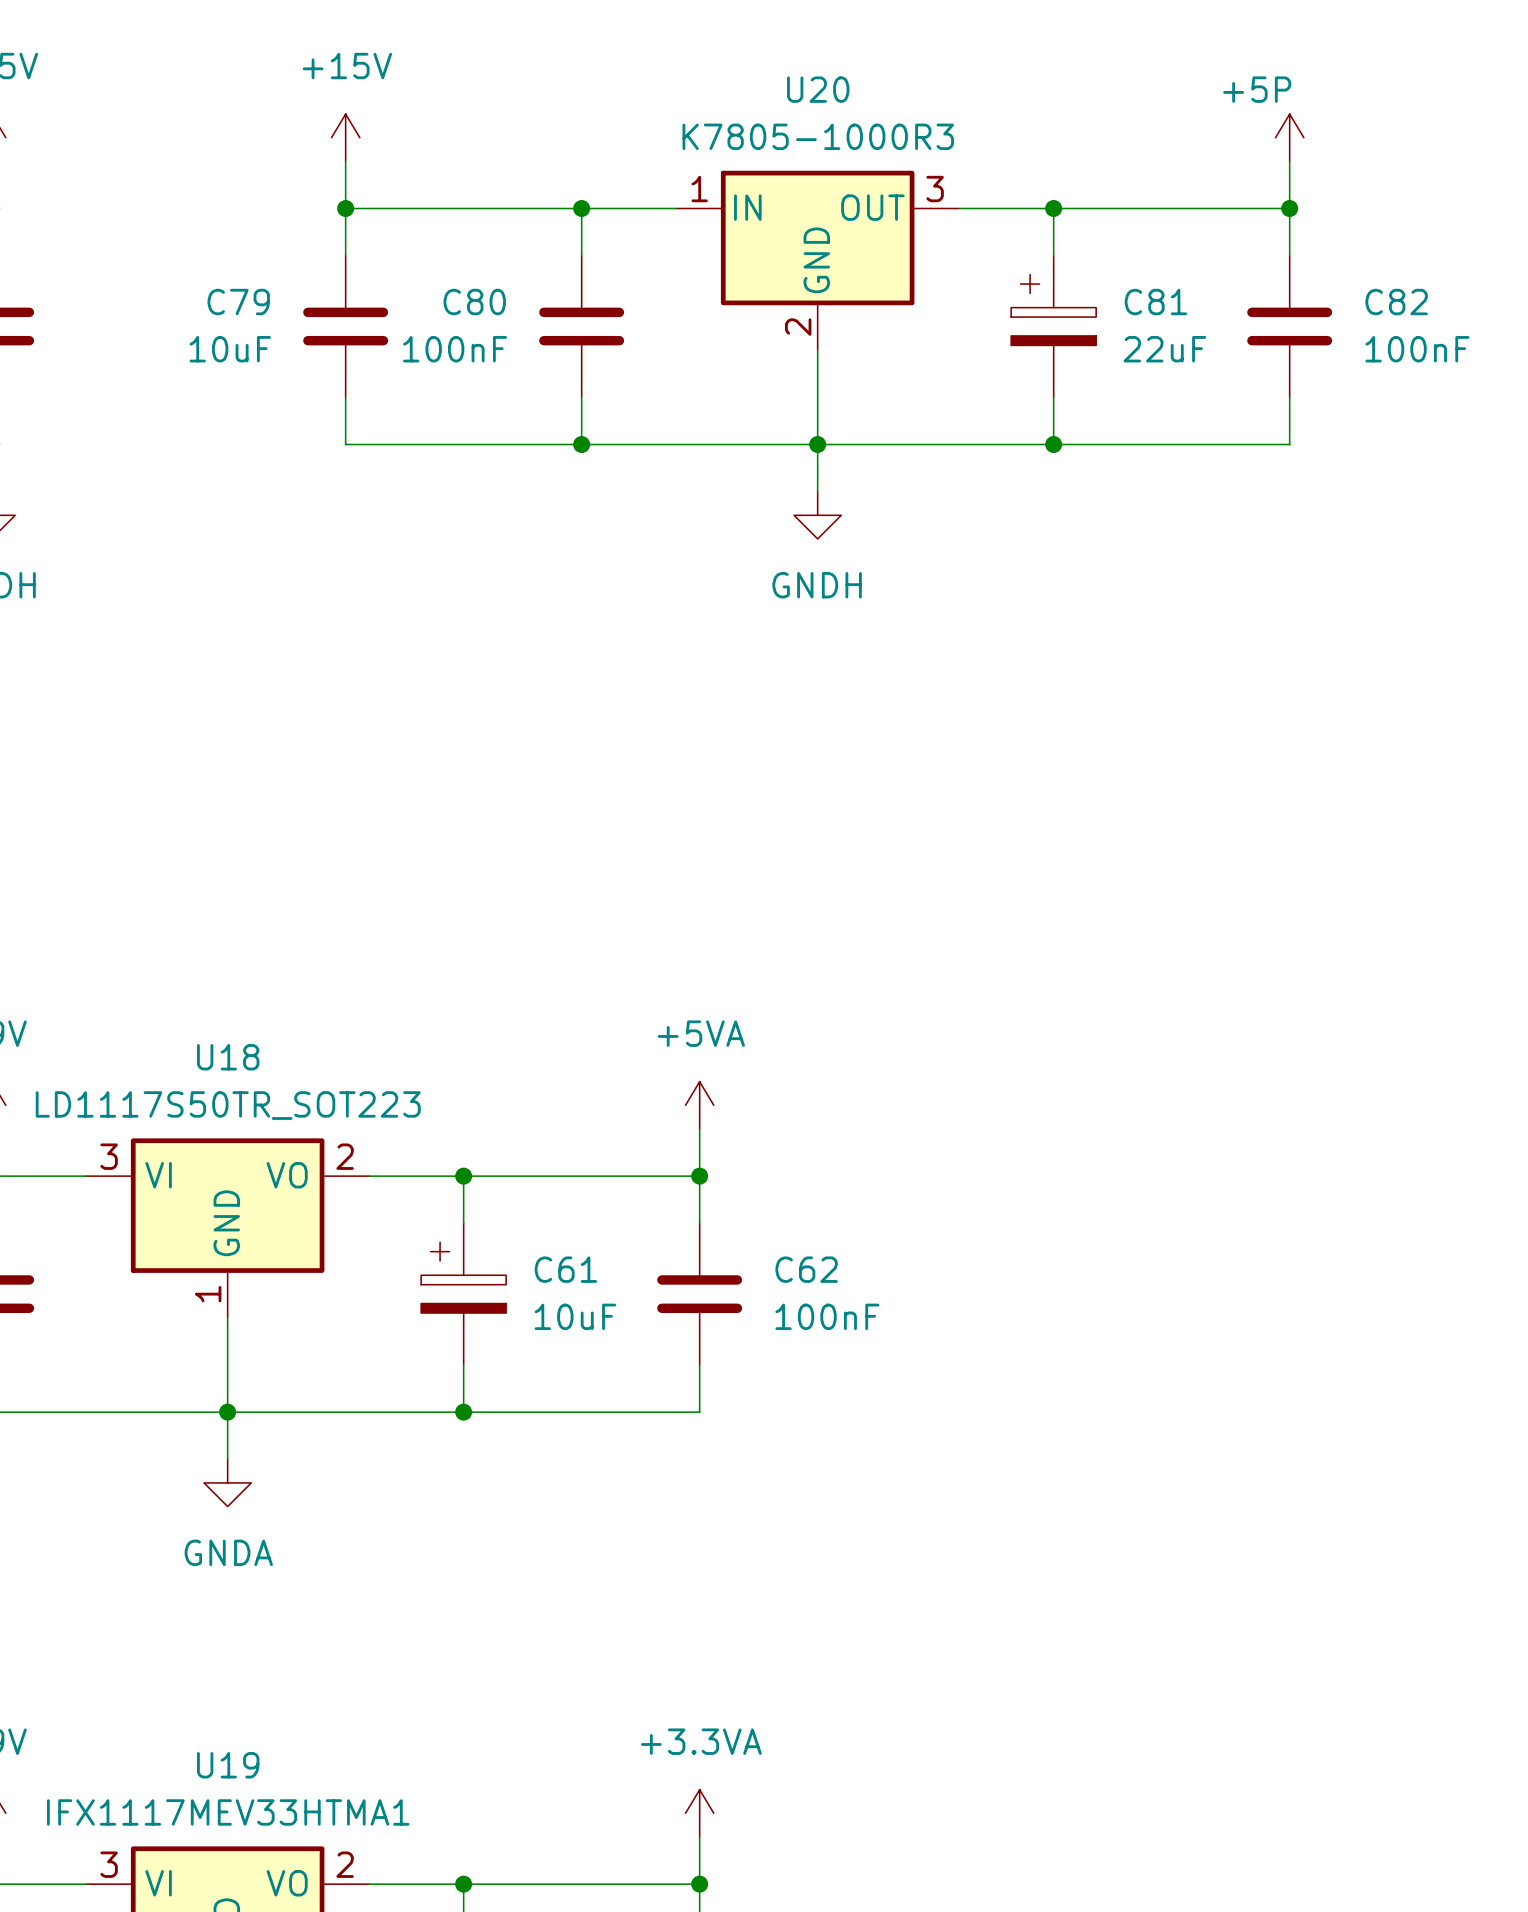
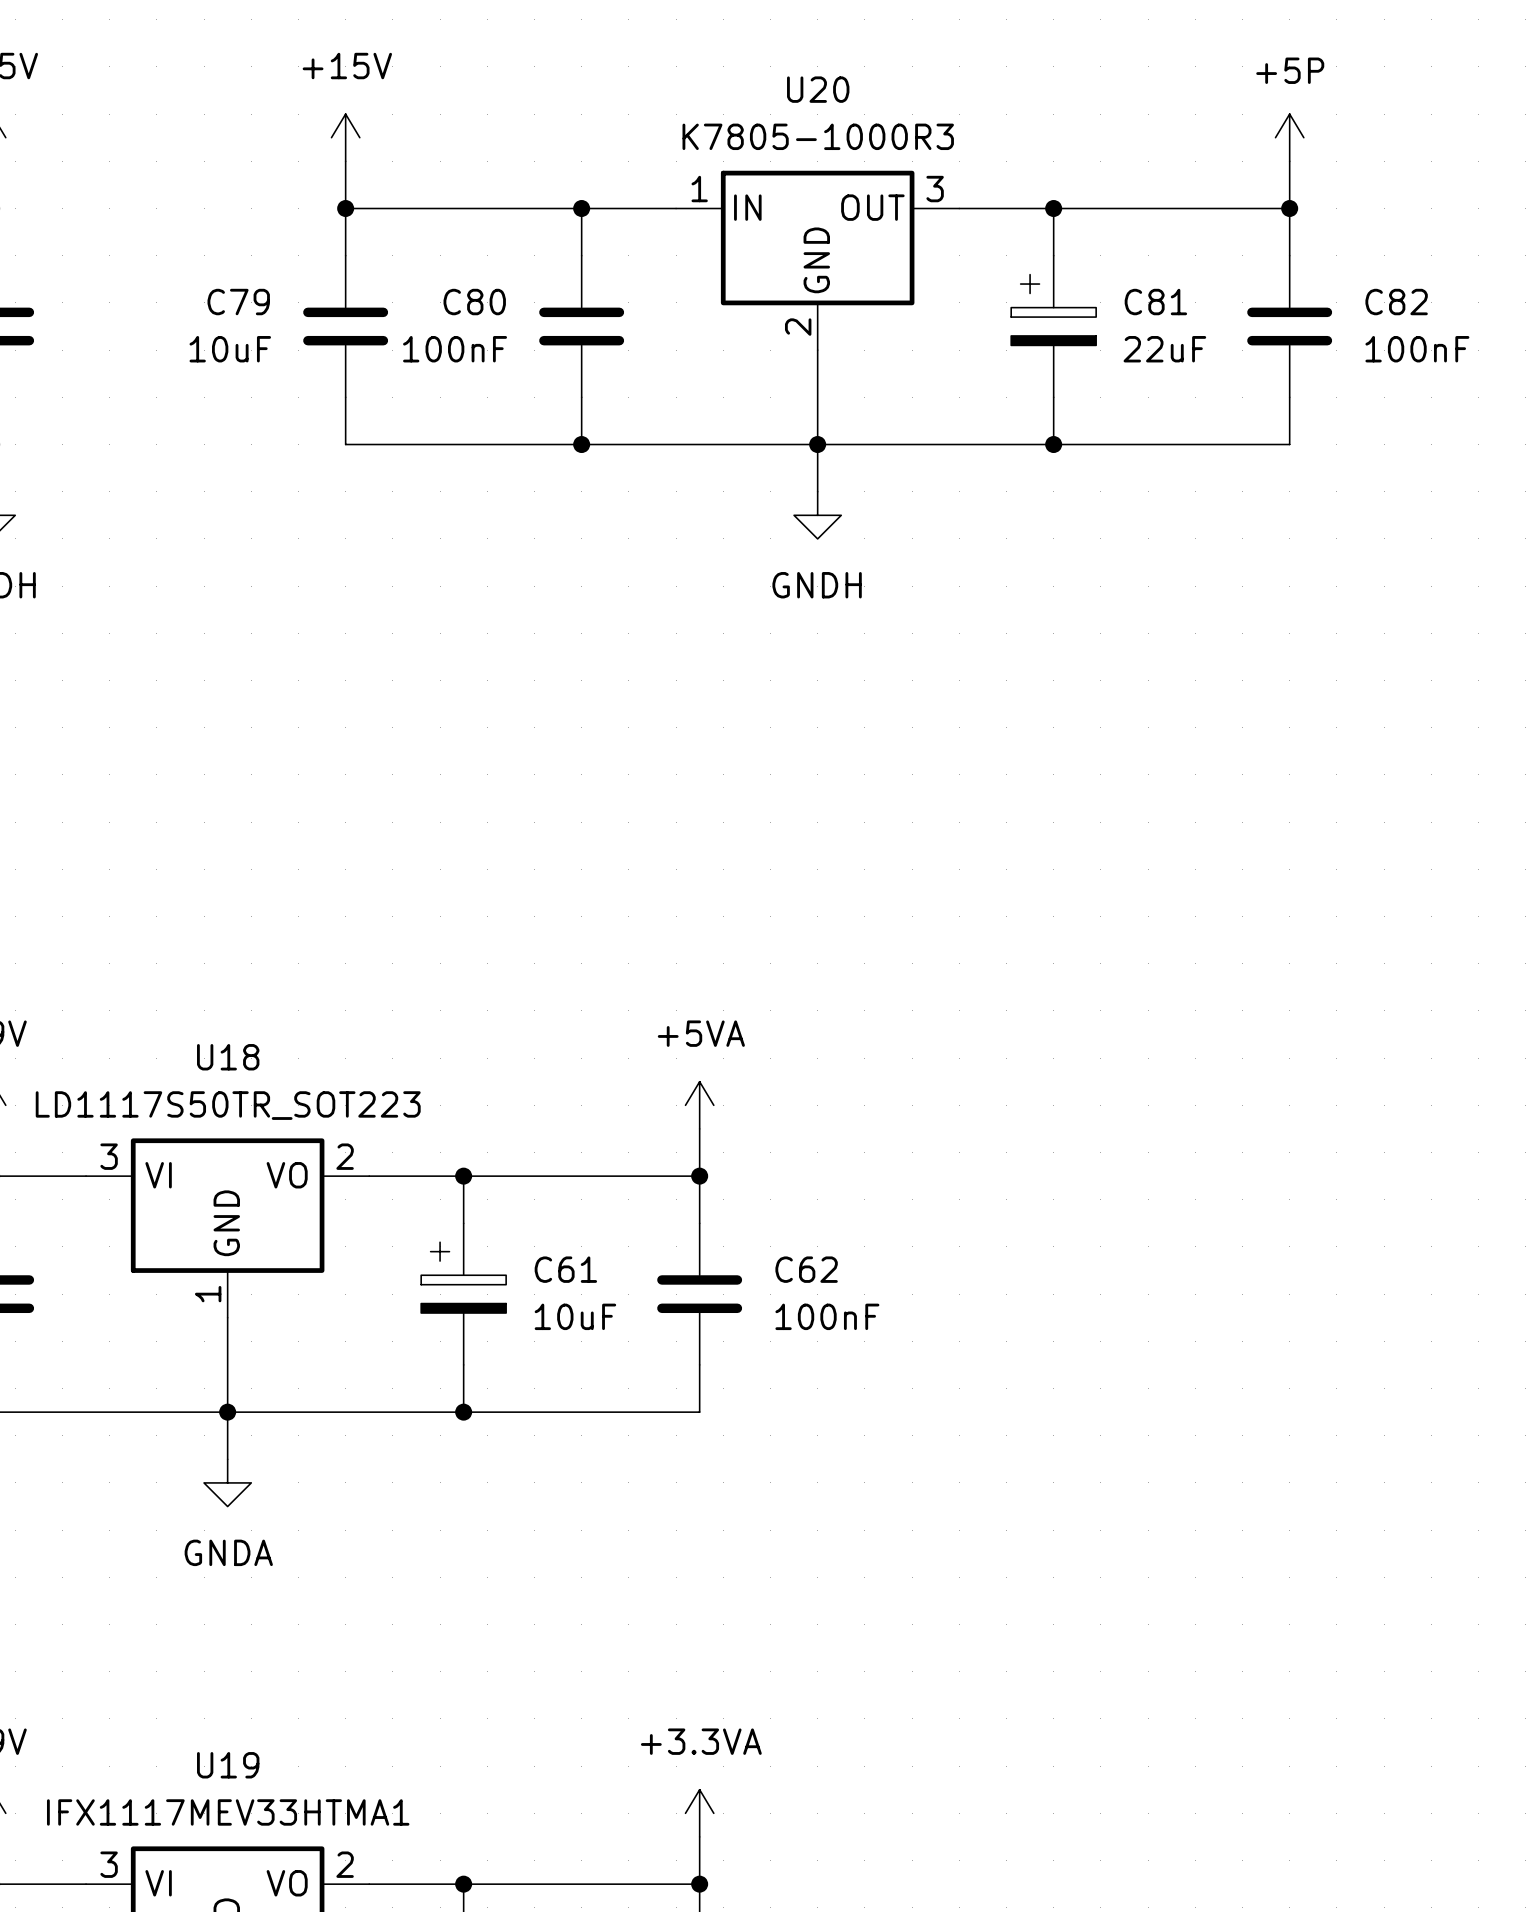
power symbol text position: +5P (1257, 89) -> +5P (1290, 70)

